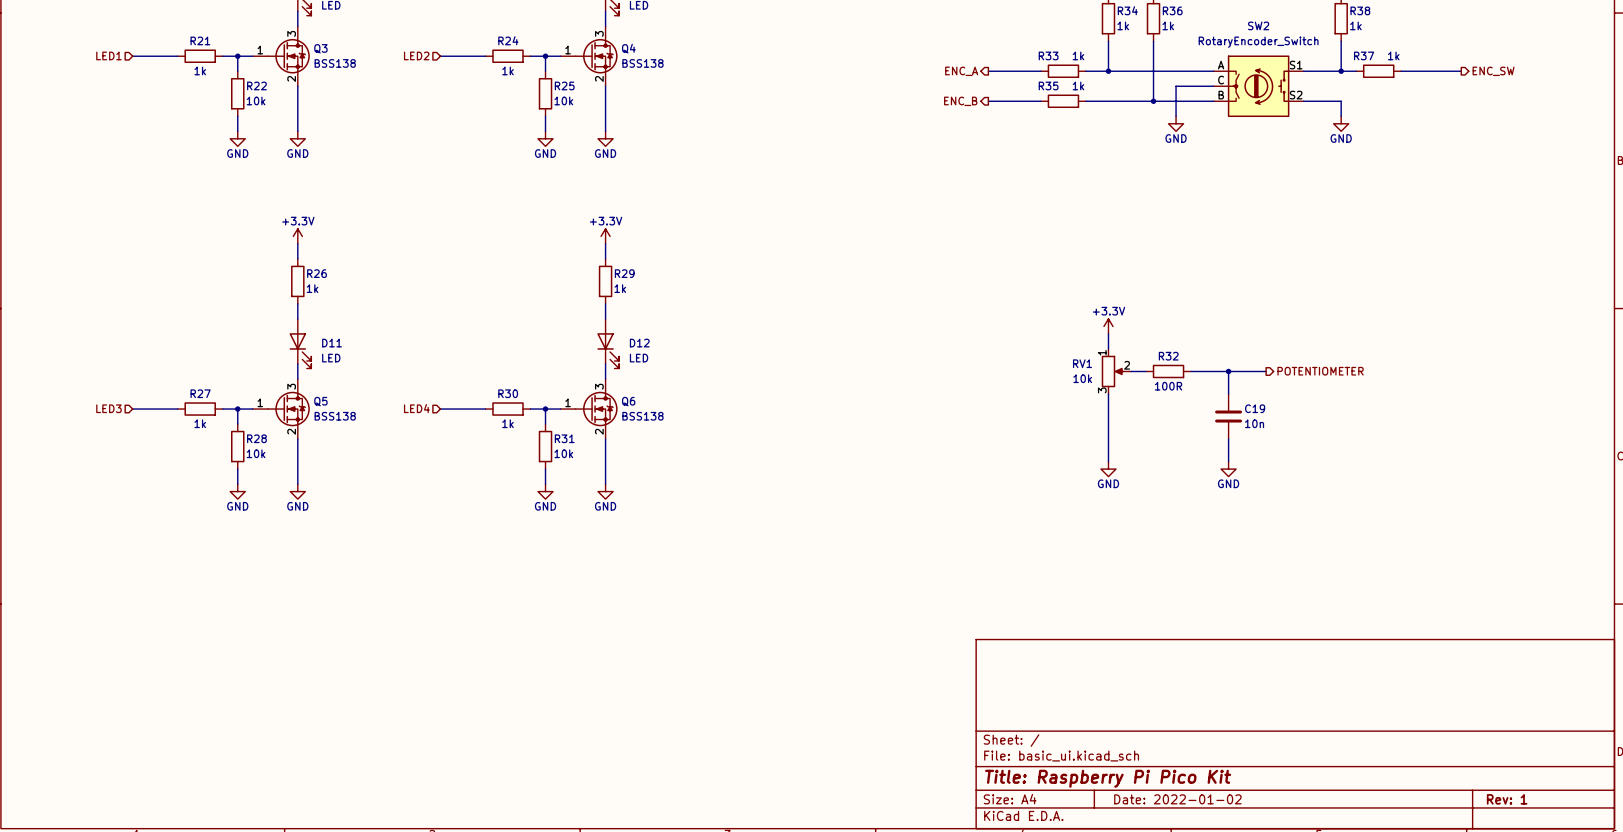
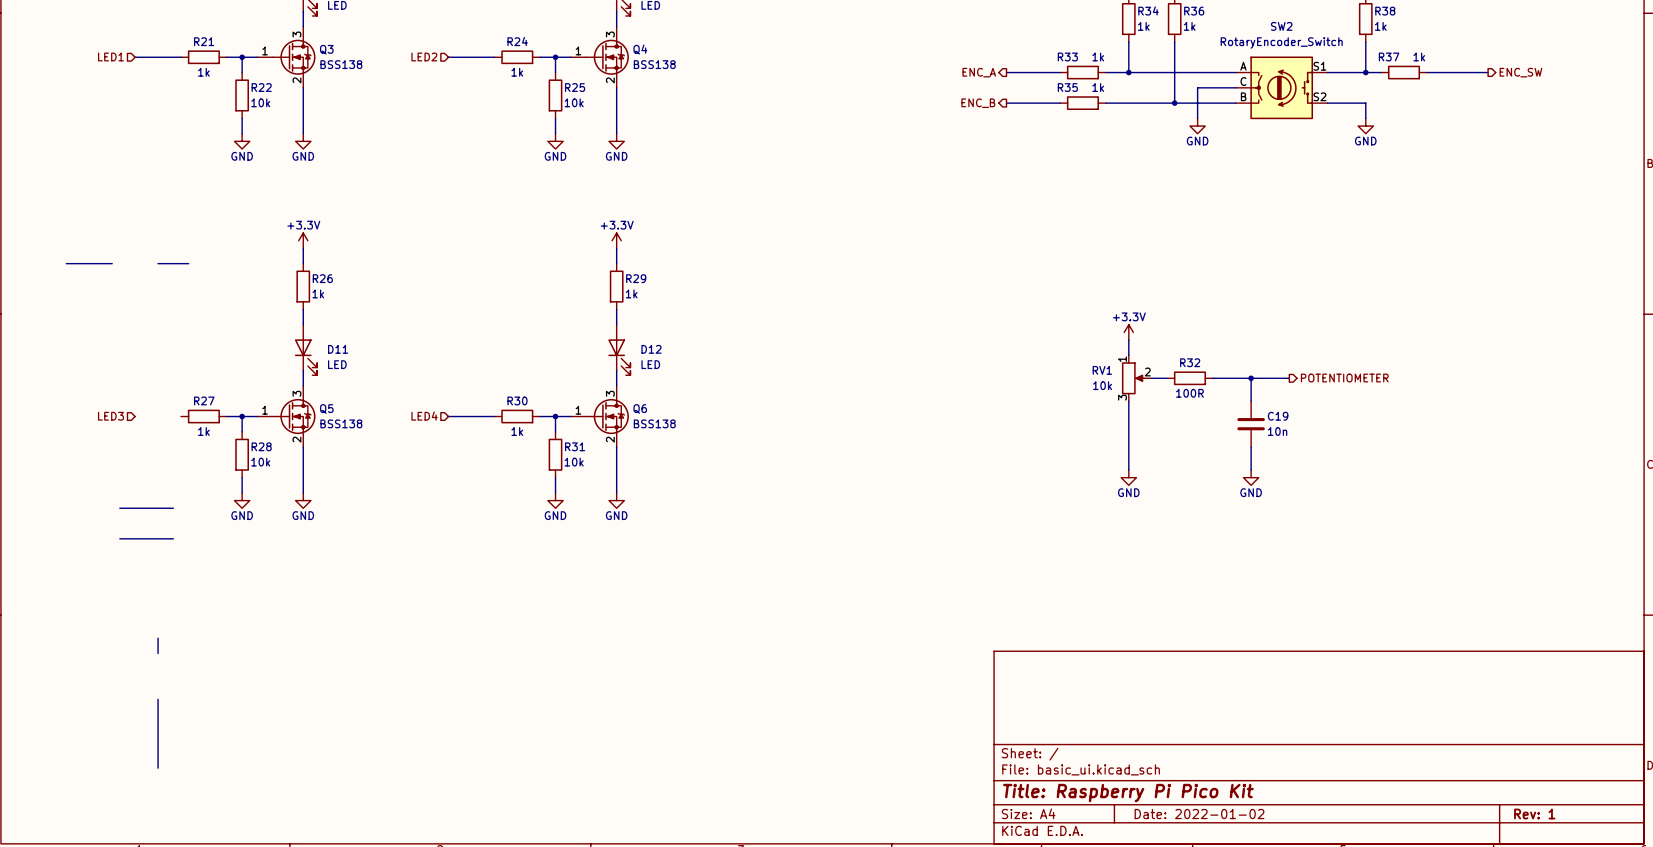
wire: none -> (66, 263) (112, 263)
wire: none -> (158, 263) (188, 263)
wire: (132, 409) (177, 409) -> none
wire: none -> (119, 508) (173, 508)
wire: none -> (119, 538) (173, 538)
wire: none -> (158, 638) (158, 653)
wire: none -> (158, 699) (158, 768)

